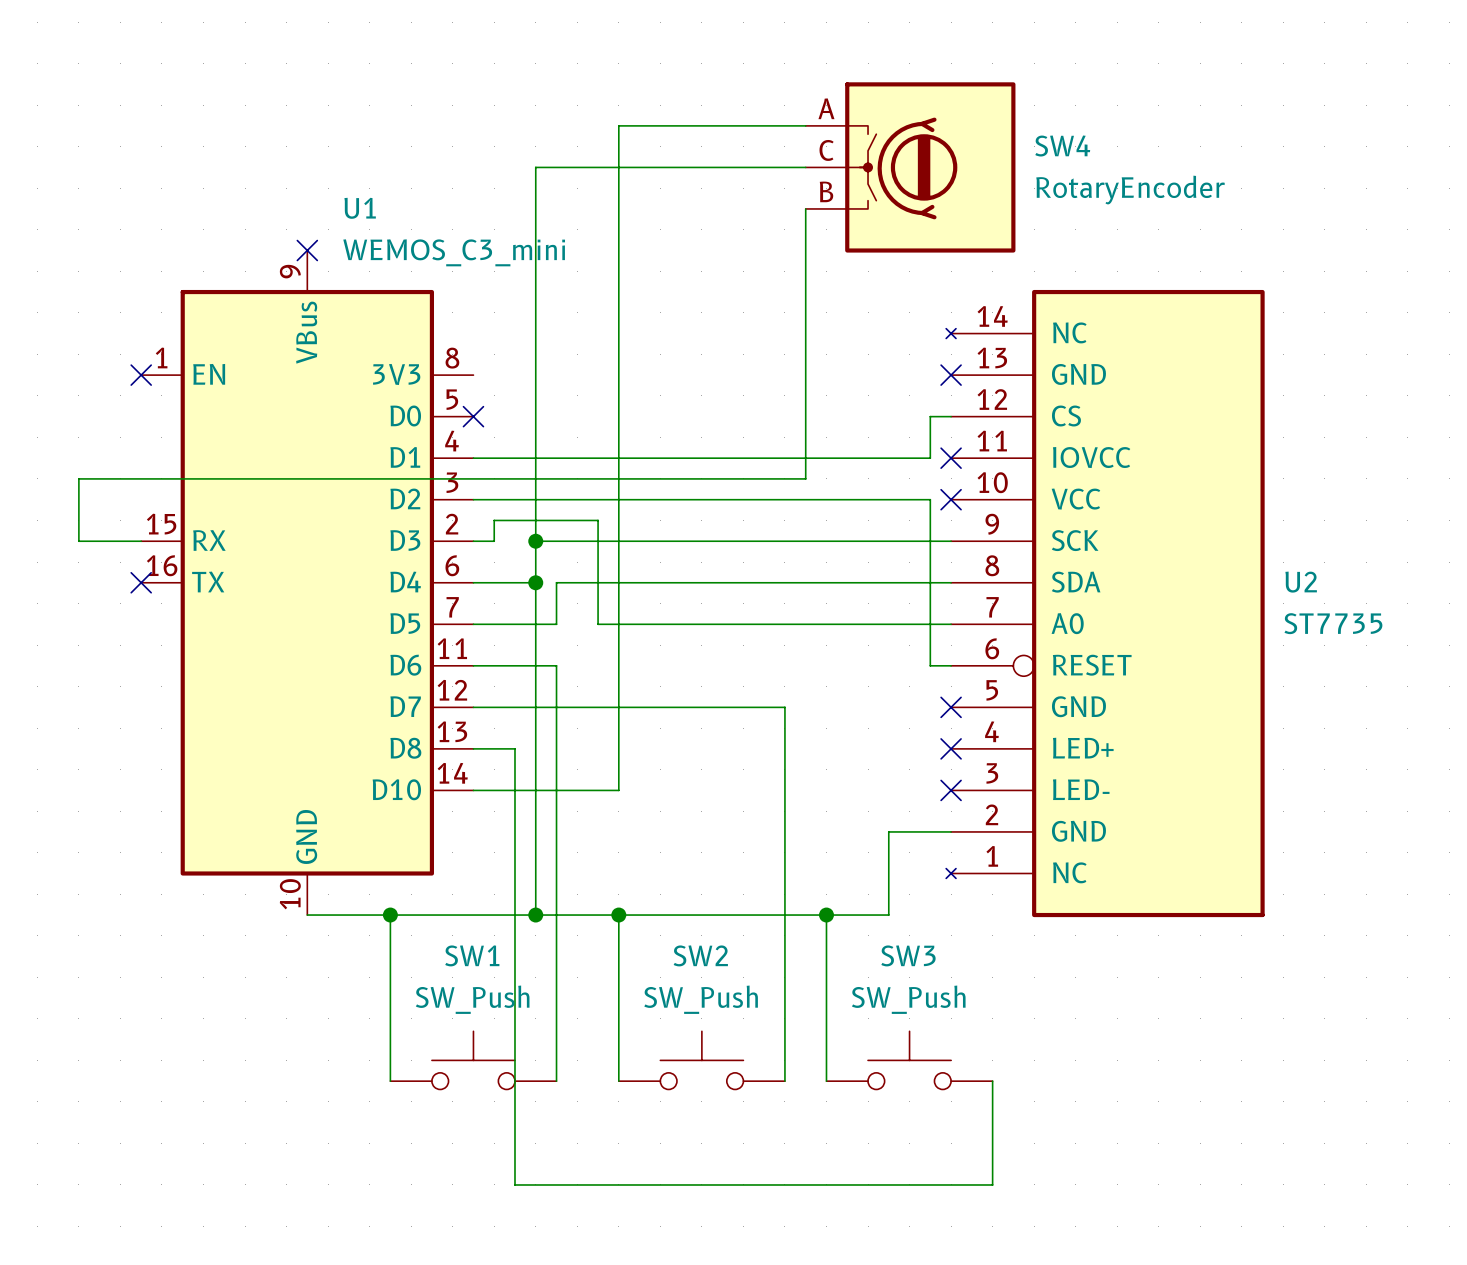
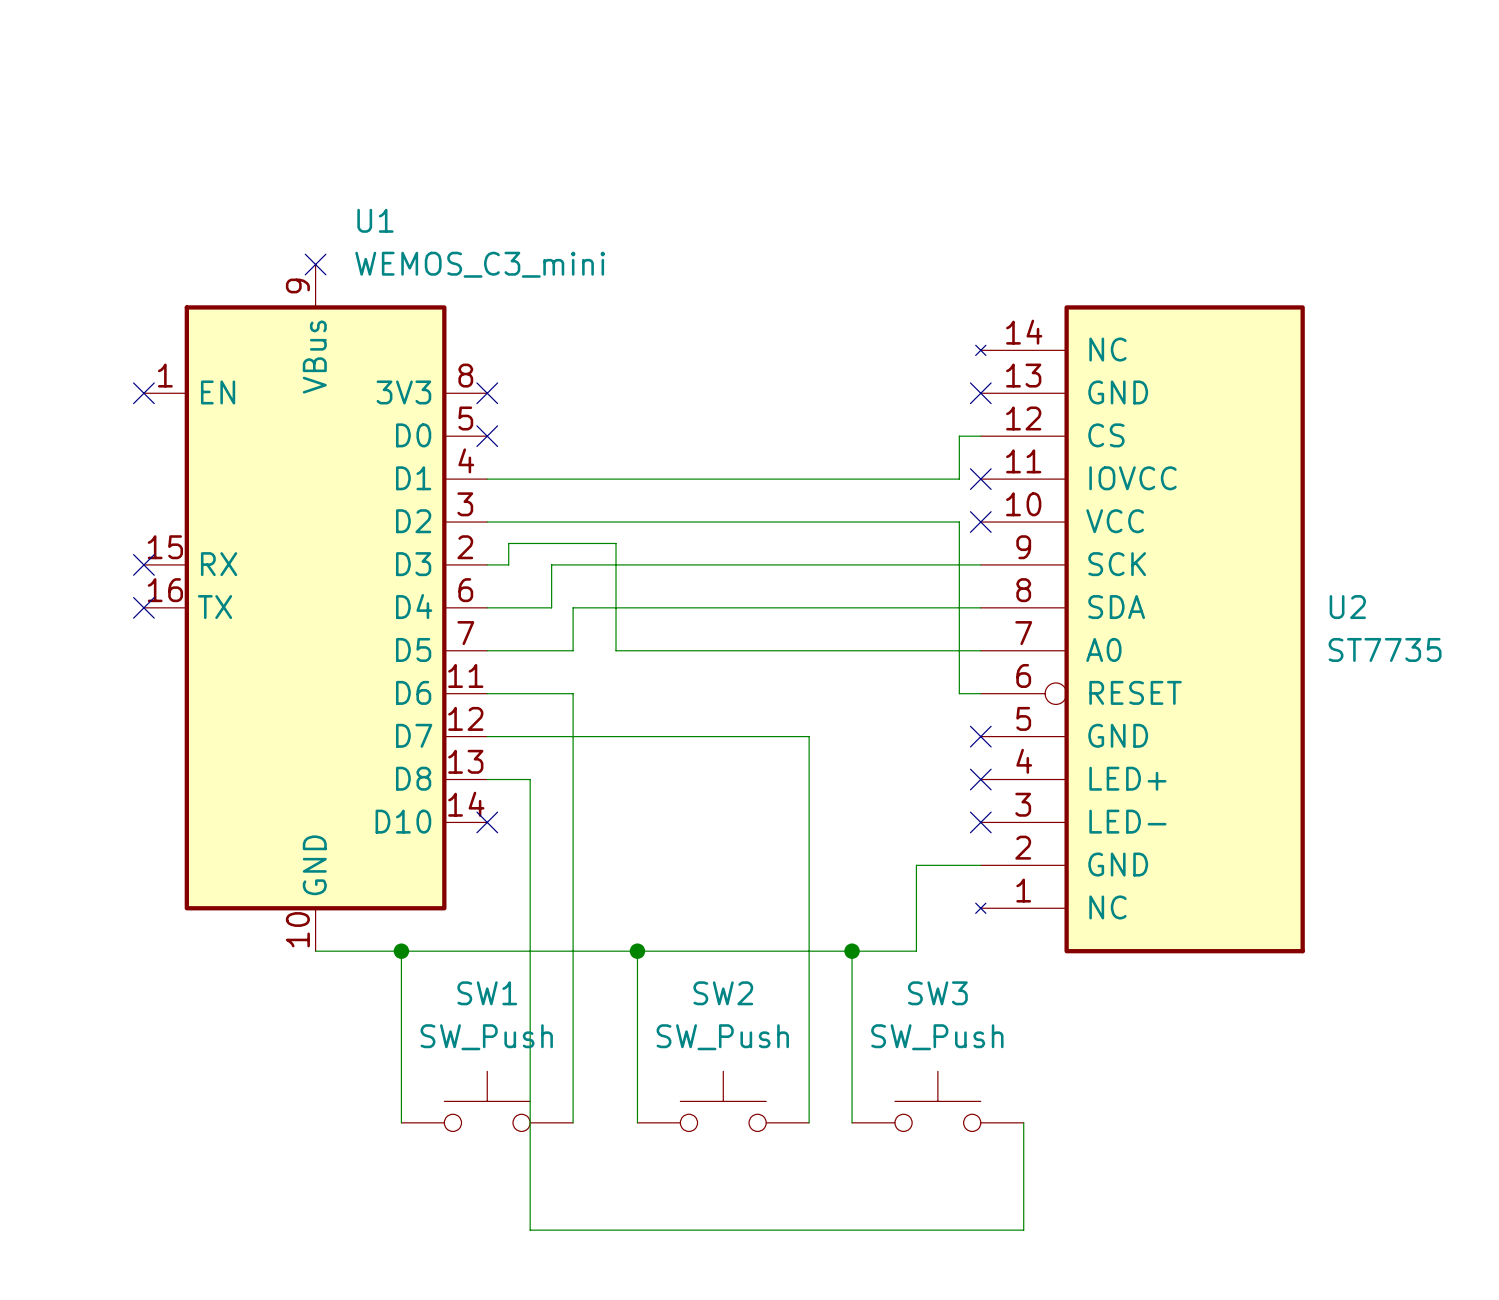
wire: (805, 125) (618, 125) (618, 790) (473, 790) -> none
wire: (805, 167) (535, 167) (535, 541) -> none
SW4: RotaryEncoder (910, 167) -> none
wire: (805, 208) (805, 478) (78, 478) (78, 541) (141, 541) -> none
no-connect mark: none -> (487, 393)
no-connect mark: none -> (143, 564)
junction: (535, 541) -> none
wire: (535, 582) (535, 915) -> none
junction: (535, 582) -> none
no-connect mark: none -> (487, 822)
junction: (535, 915) -> none

